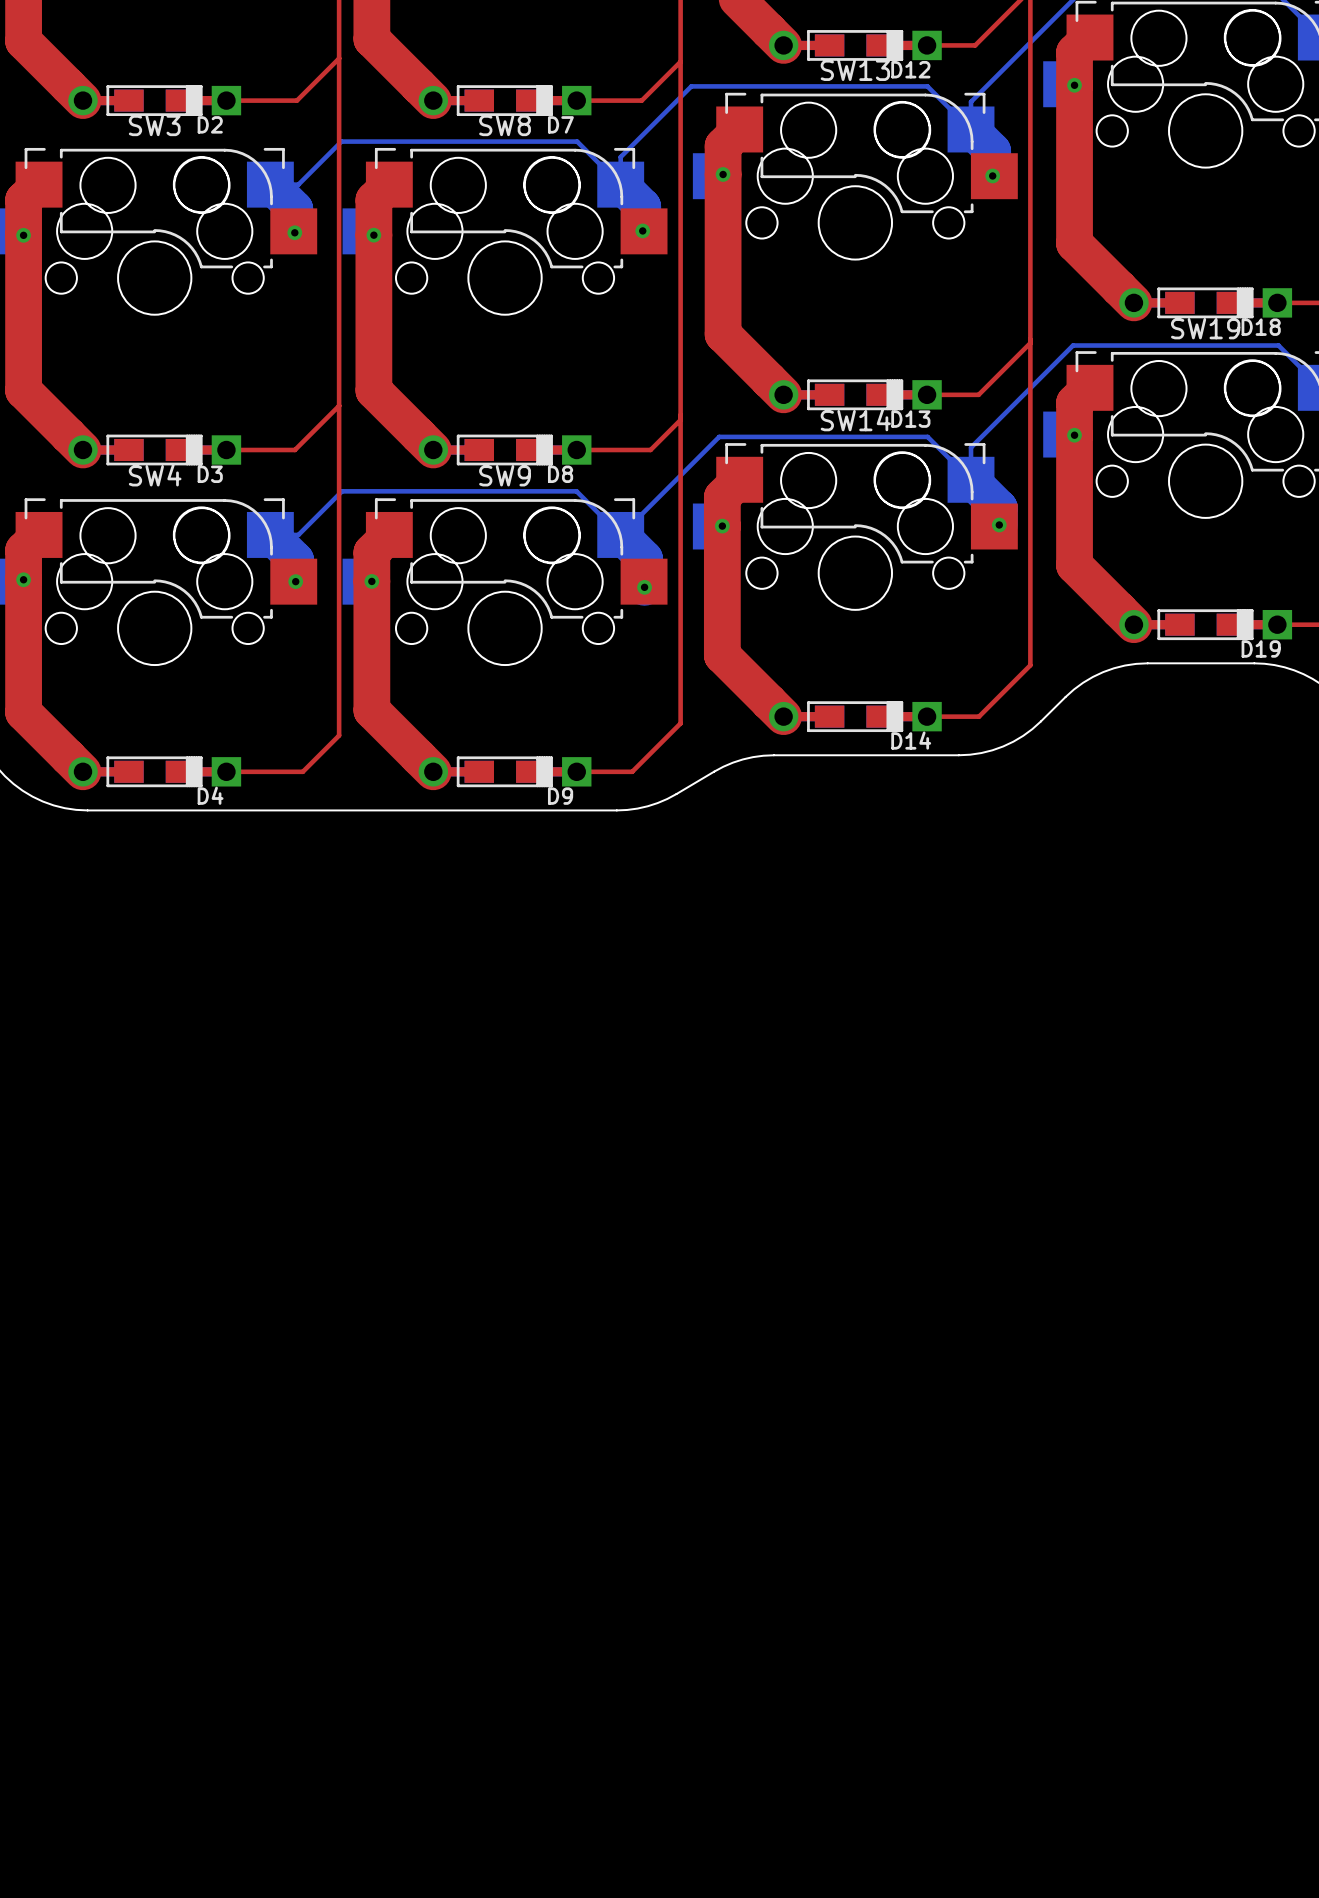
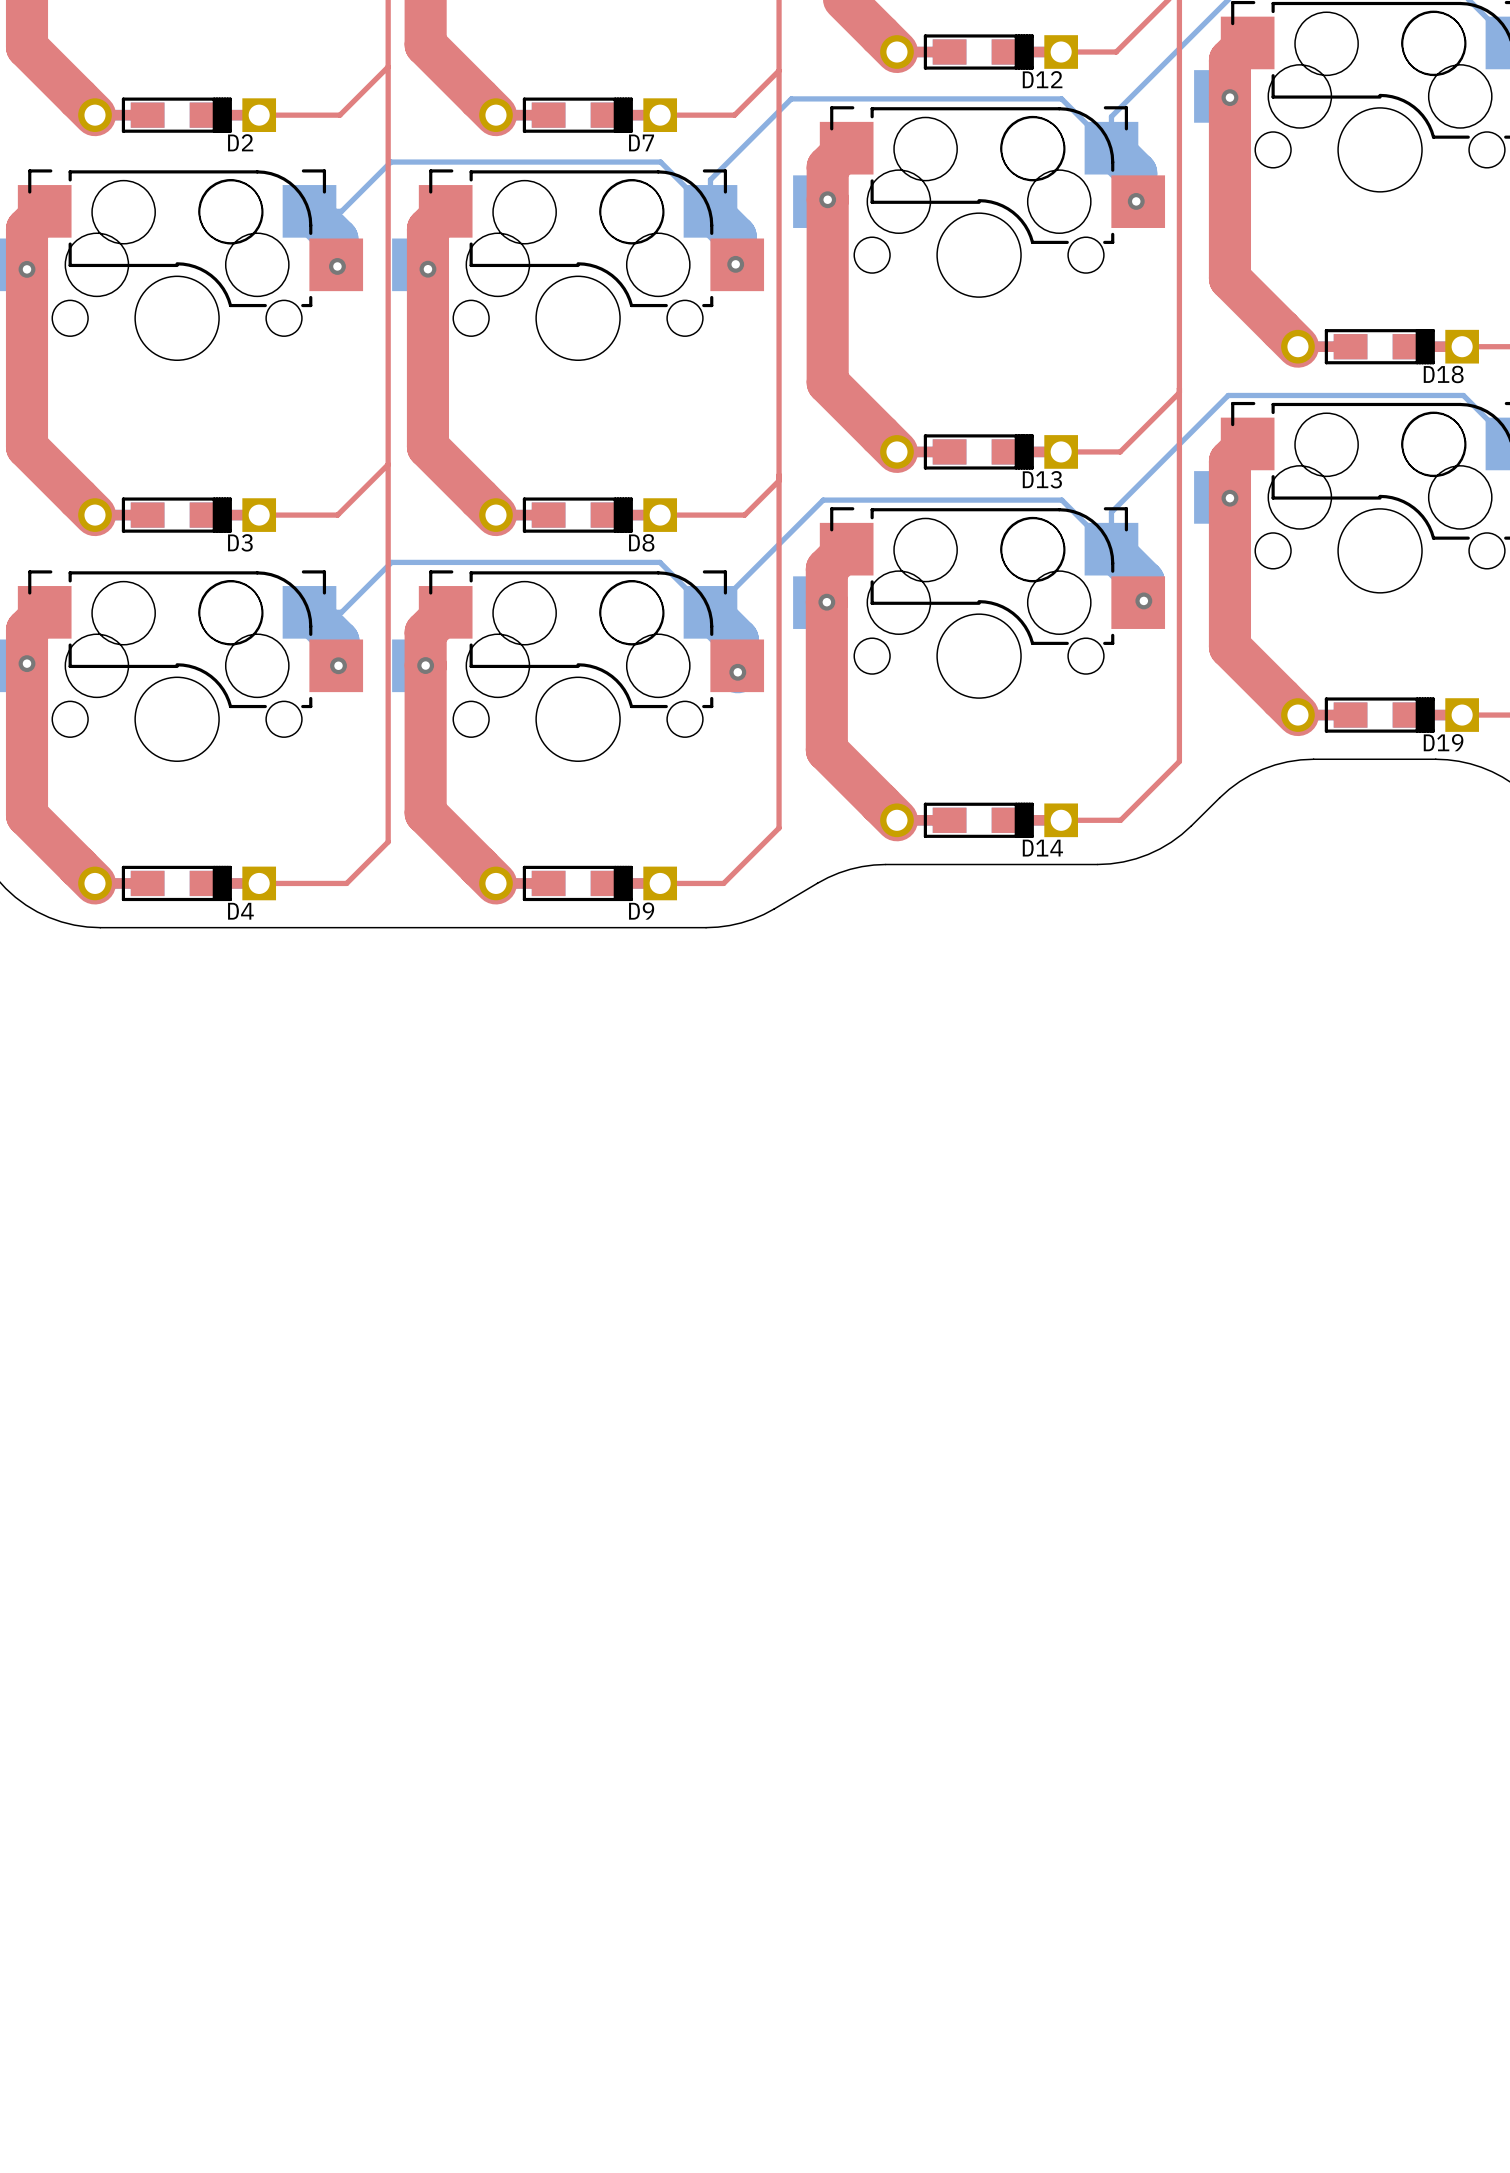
SW13 name: SW13 (855, 70) -> none
SW3 name: SW3 (154, 125) -> none
SW8 name: SW8 (505, 125) -> none
SW19 name: SW19 (1205, 328) -> none
SW14 name: SW14 (855, 420) -> none
SW4 name: SW4 (155, 475) -> none
SW9 name: SW9 (505, 475) -> none

